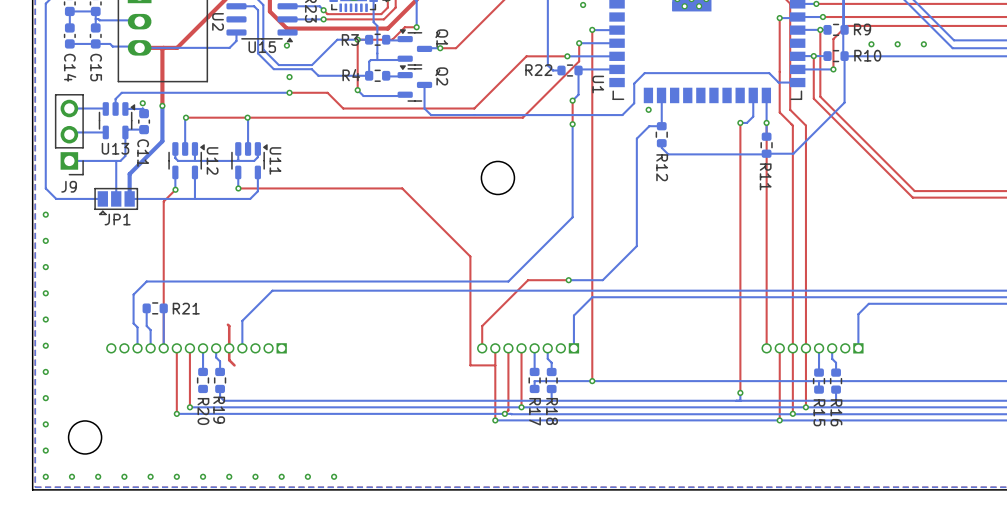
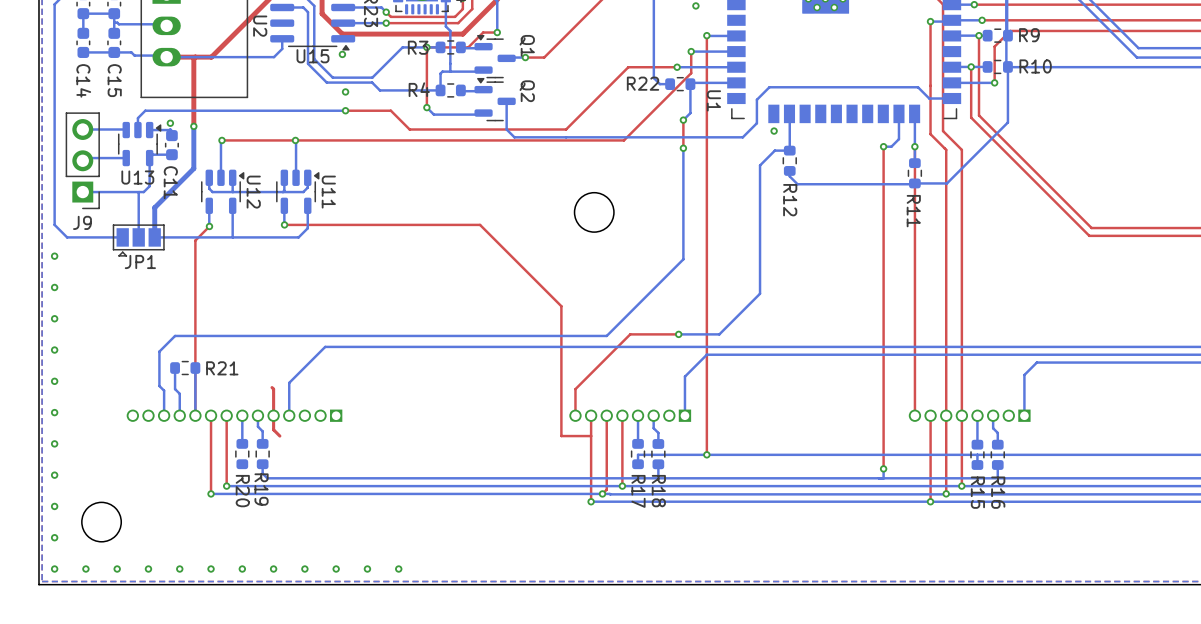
via: (871, 44) -> none
via: (897, 44) -> none
via: (923, 44) -> none

